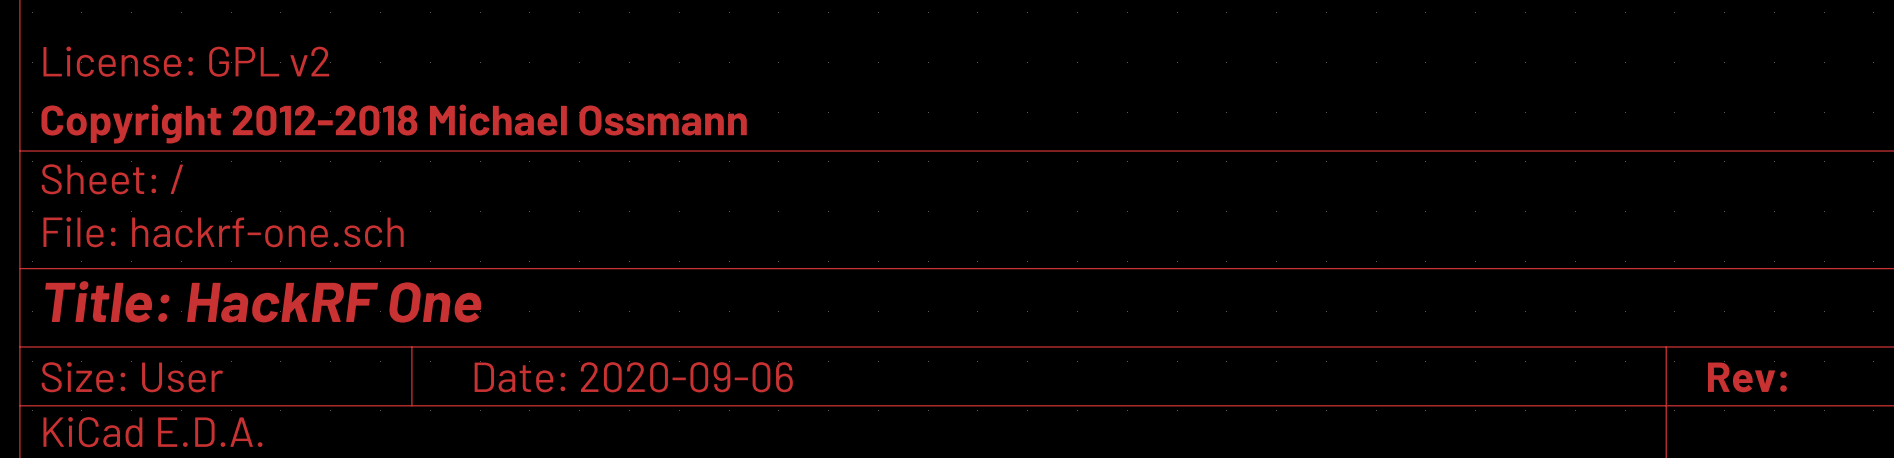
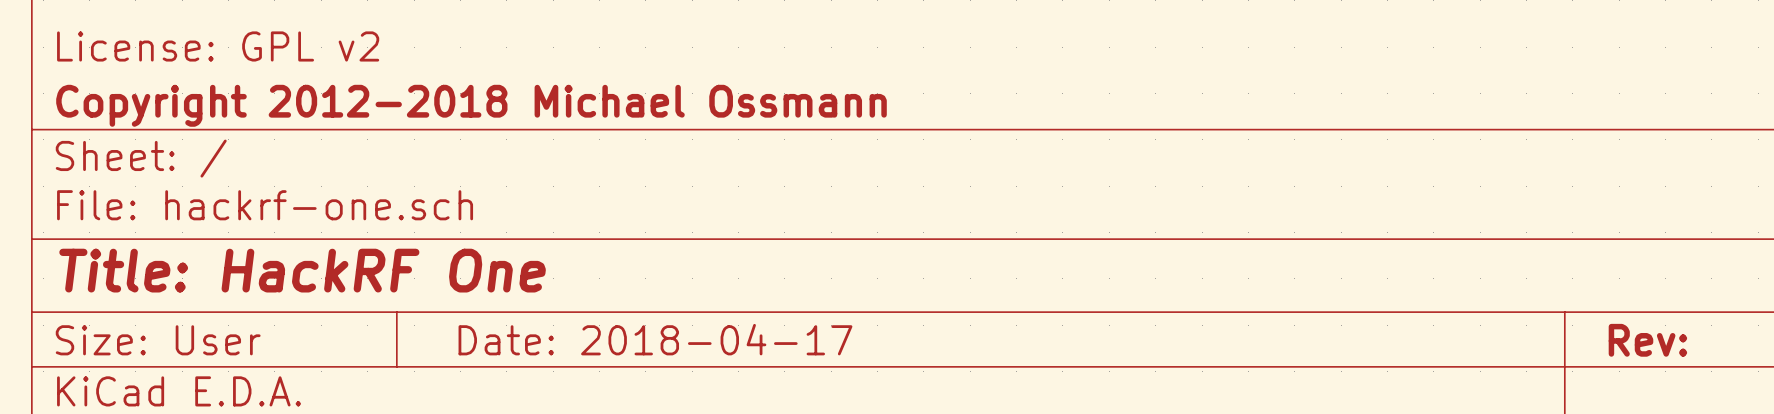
title block: Date: 2020-09-06 (633, 377) -> Date: 2018-04-17 (655, 339)

